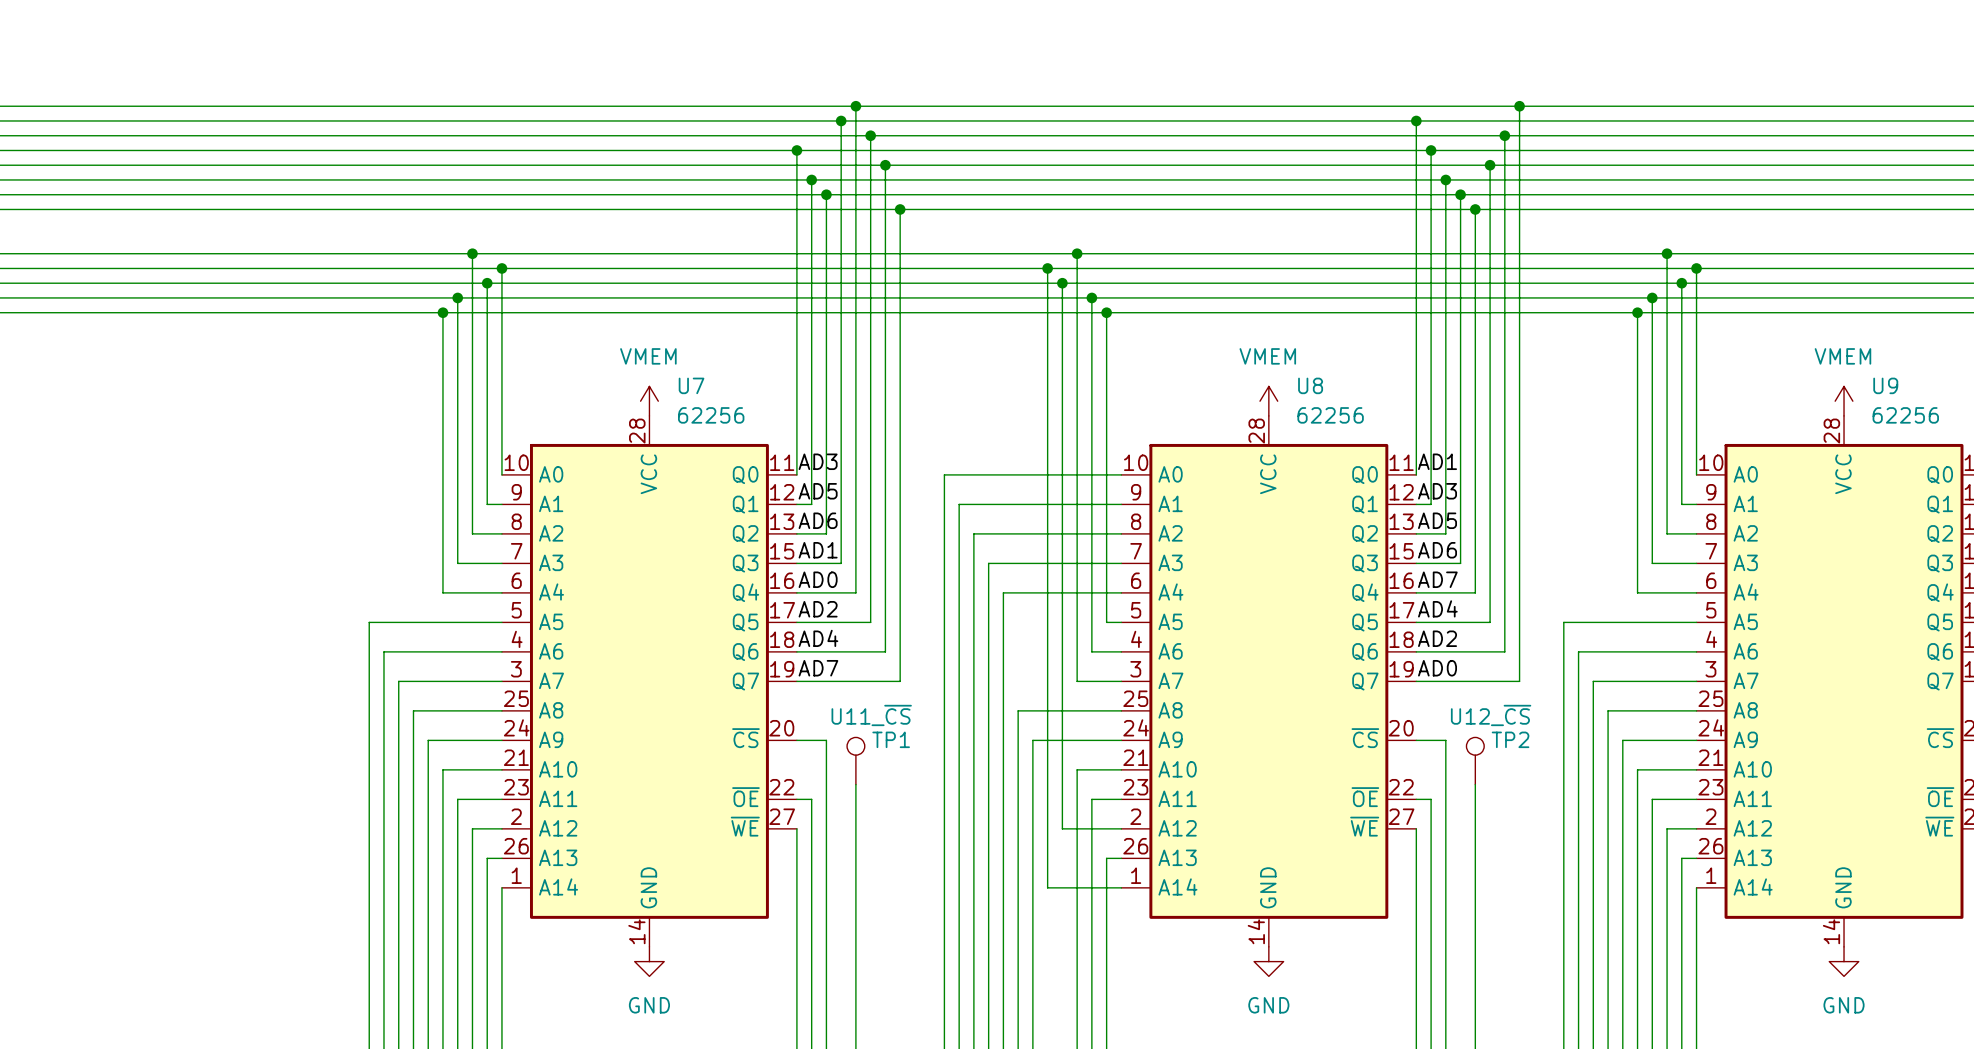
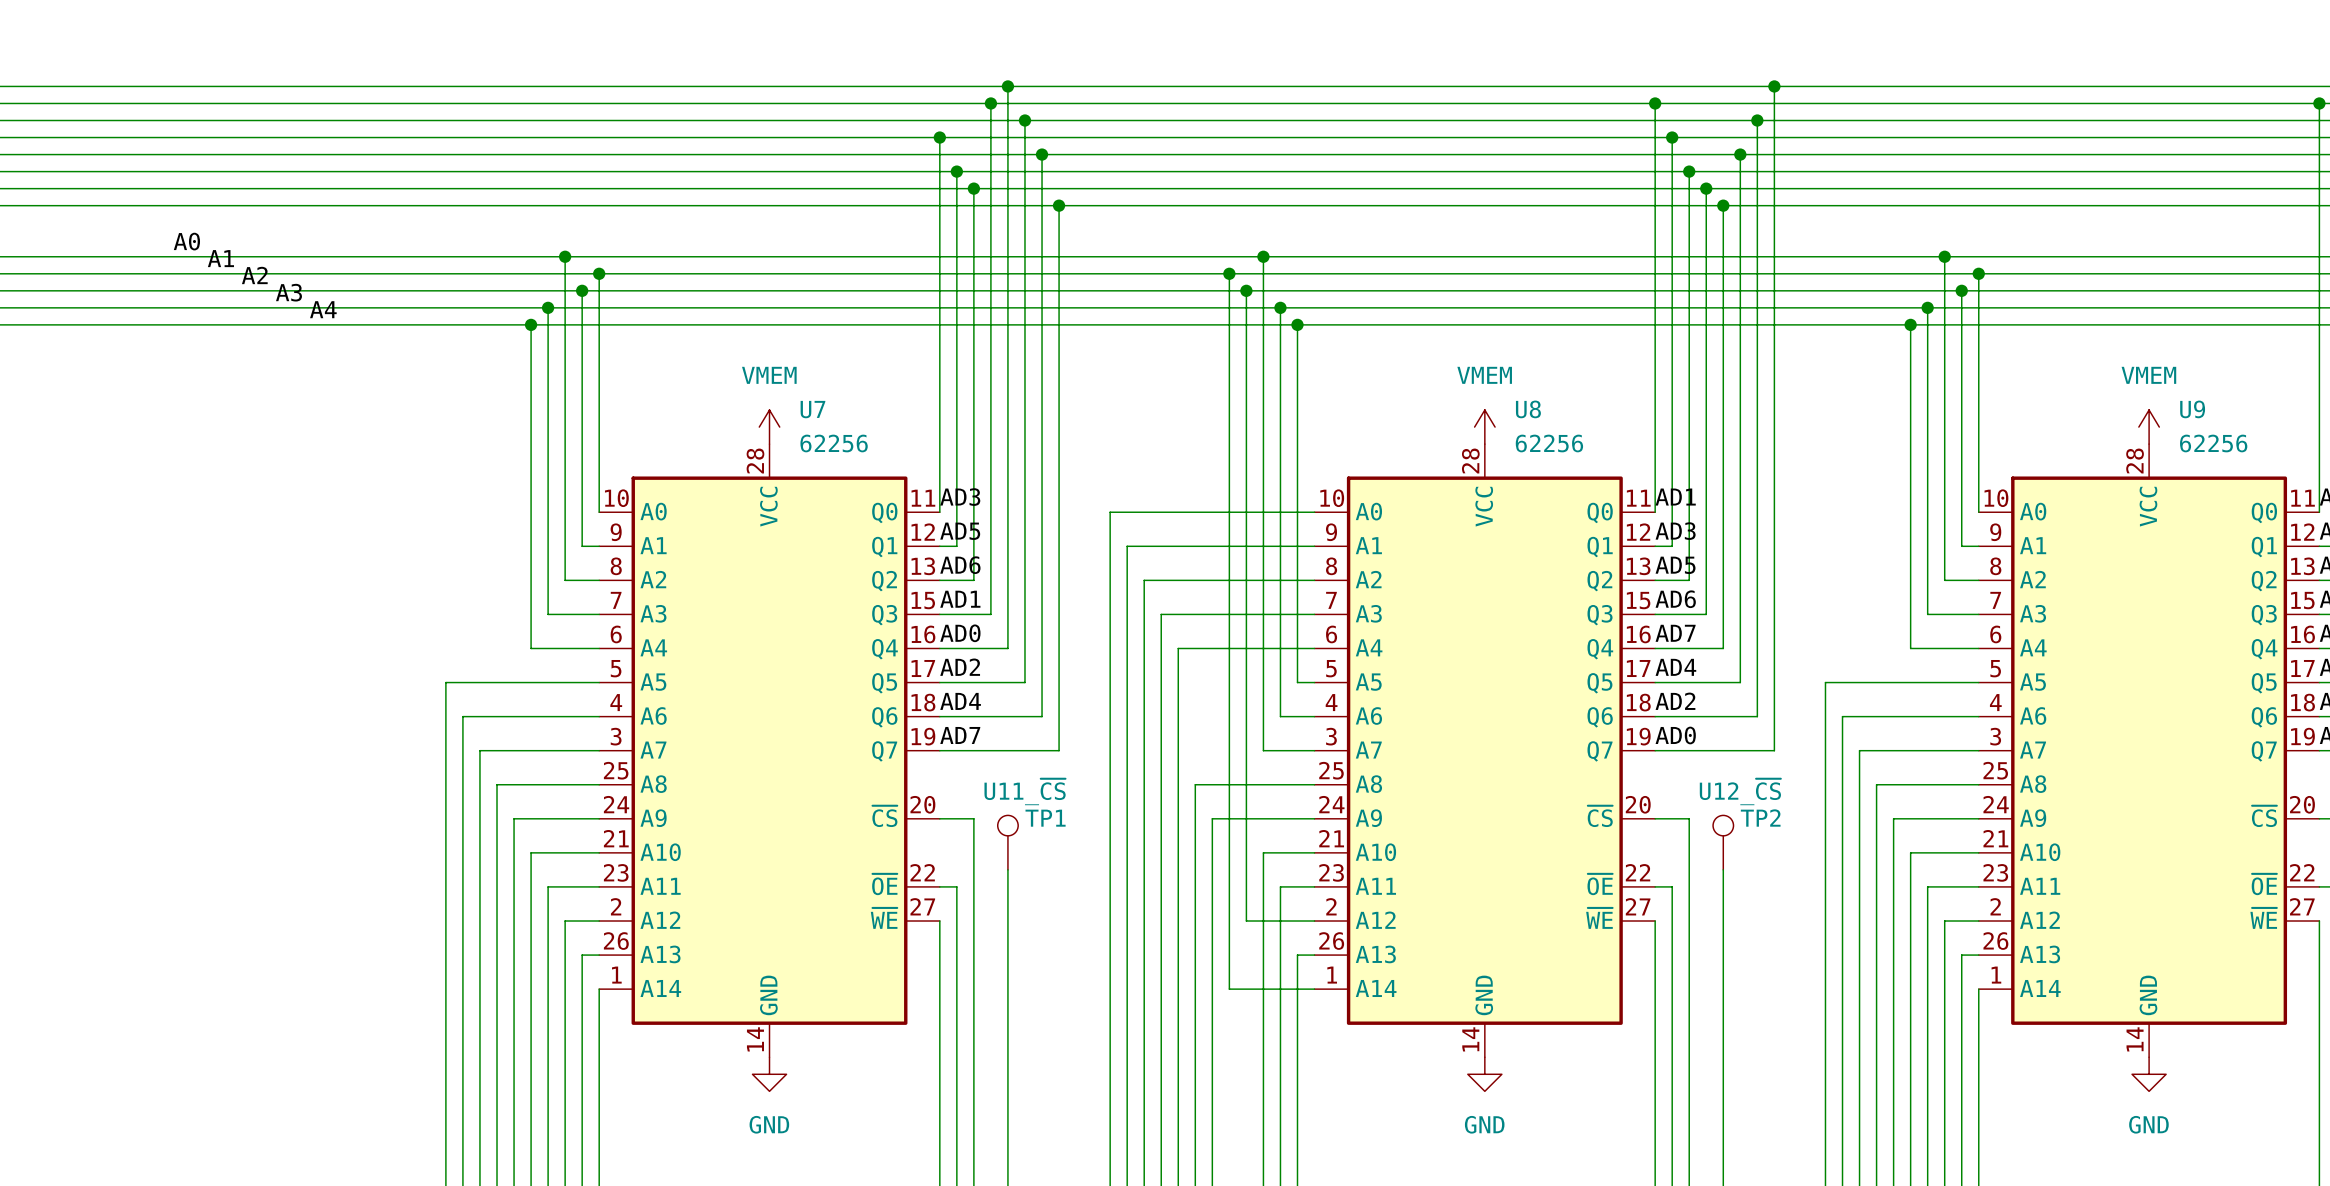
label: none -> A0 (186, 241)
label: none -> A1 (220, 258)
label: none -> A2 (254, 275)
label: none -> A3 (288, 292)
label: none -> A4 (323, 309)

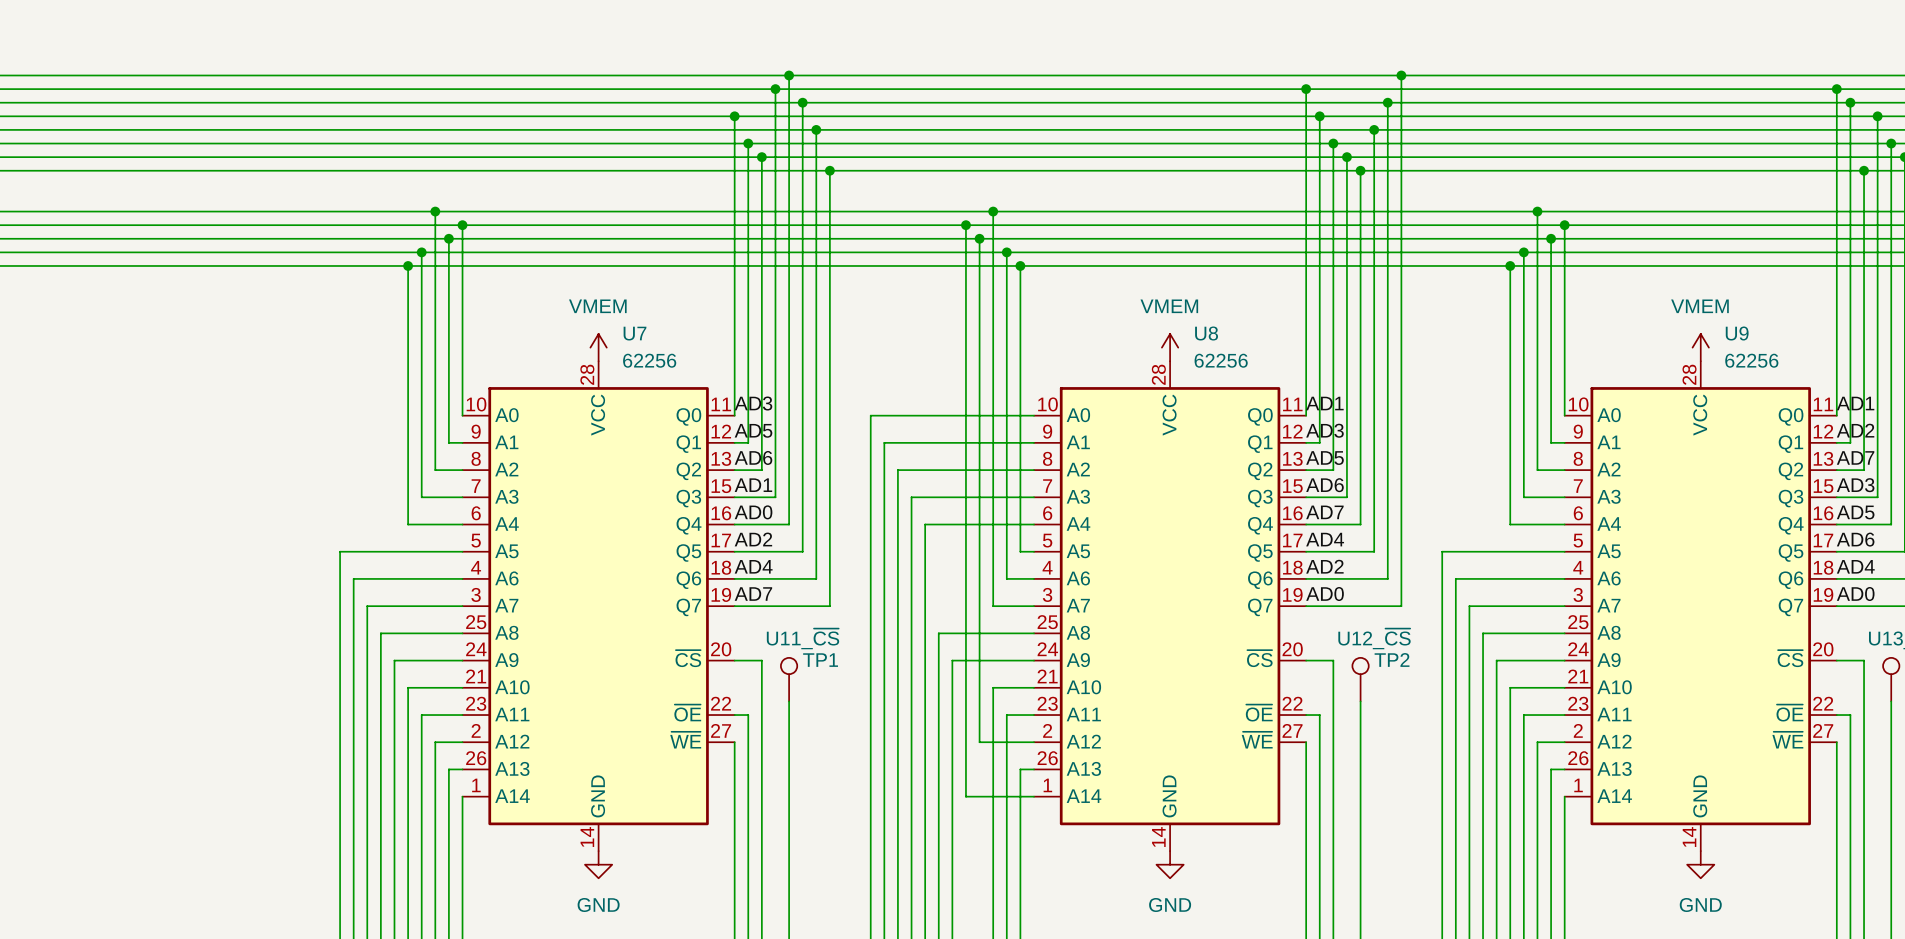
label: A0 (186, 241) -> none
label: A1 (220, 258) -> none
label: A2 (254, 275) -> none
label: A3 (288, 292) -> none
label: A4 (323, 309) -> none

